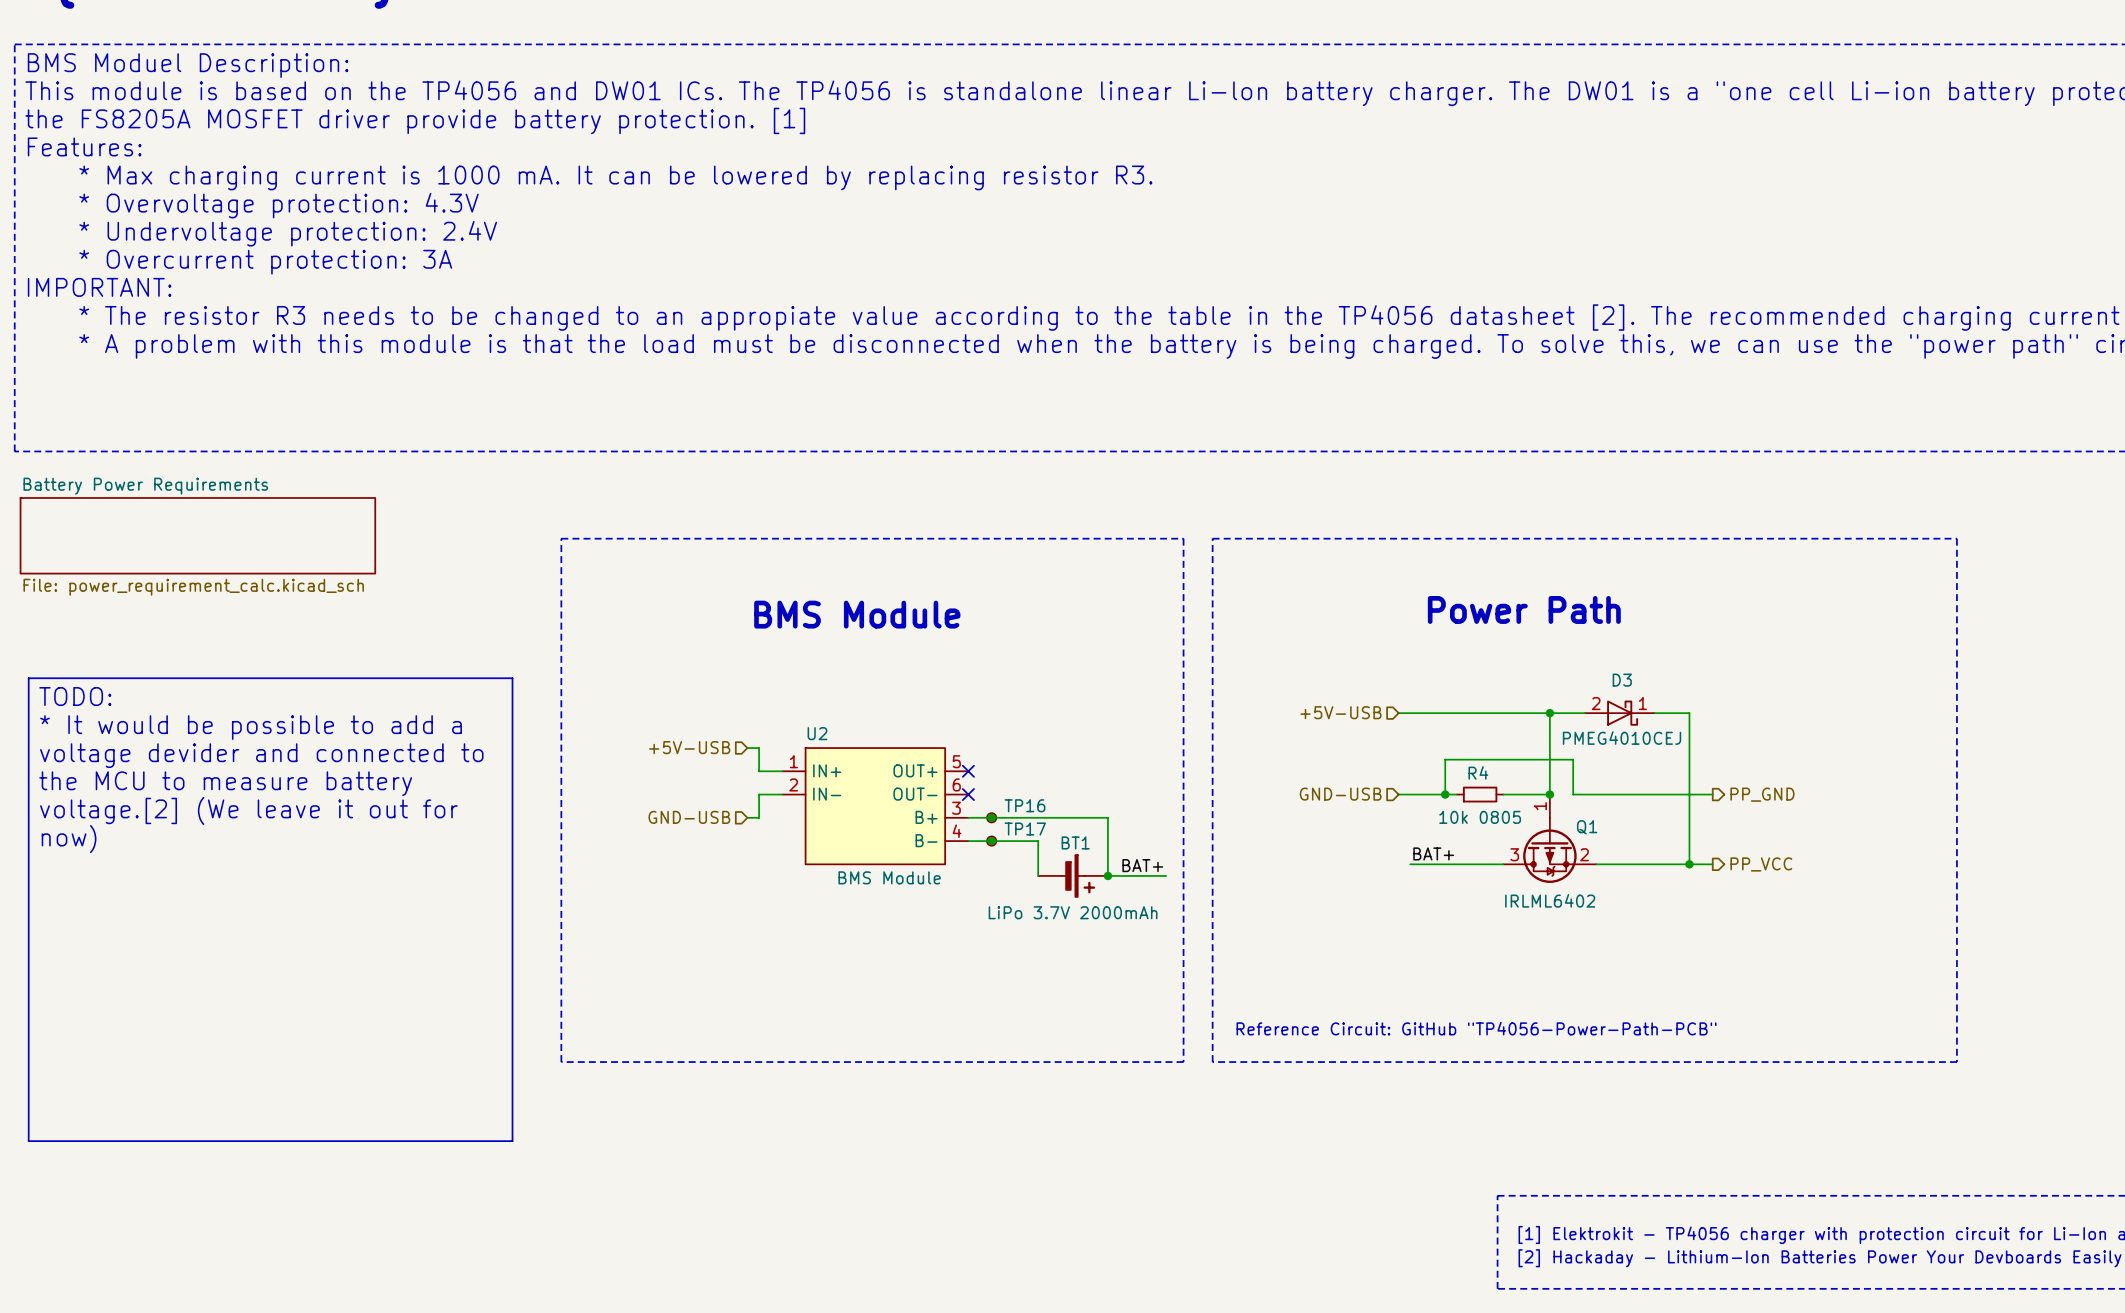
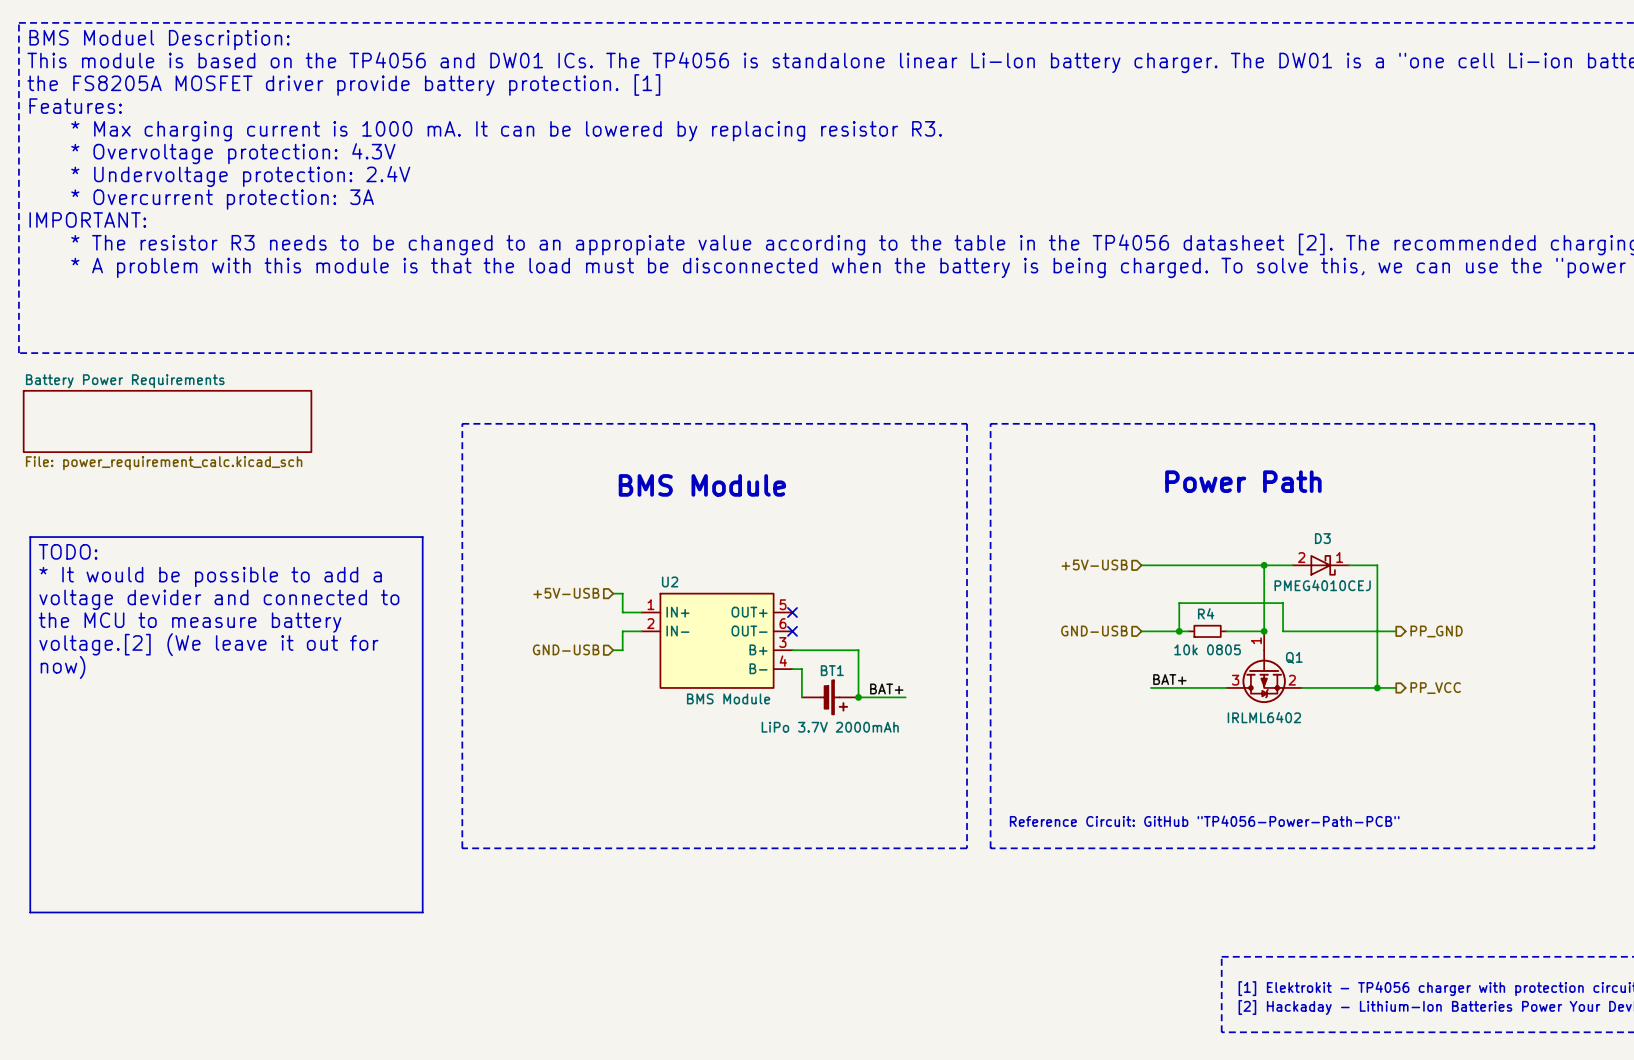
junction: (991, 817) -> none
TP16: (991, 817) -> none
wire: (1049, 817) (1107, 817) (1107, 875) (1166, 875) -> (858, 650) (858, 697) (905, 697)
wire: (980, 841) (1038, 841) (1038, 875) -> (801, 669) (801, 697)
junction: (991, 841) -> none
TP17: (991, 841) -> none
label position: BAT+ (1142, 865) -> BAT+ (886, 688)
junction: none -> (858, 697)
BT1 position: (1073, 875) -> (830, 697)
junction: (1107, 875) -> none

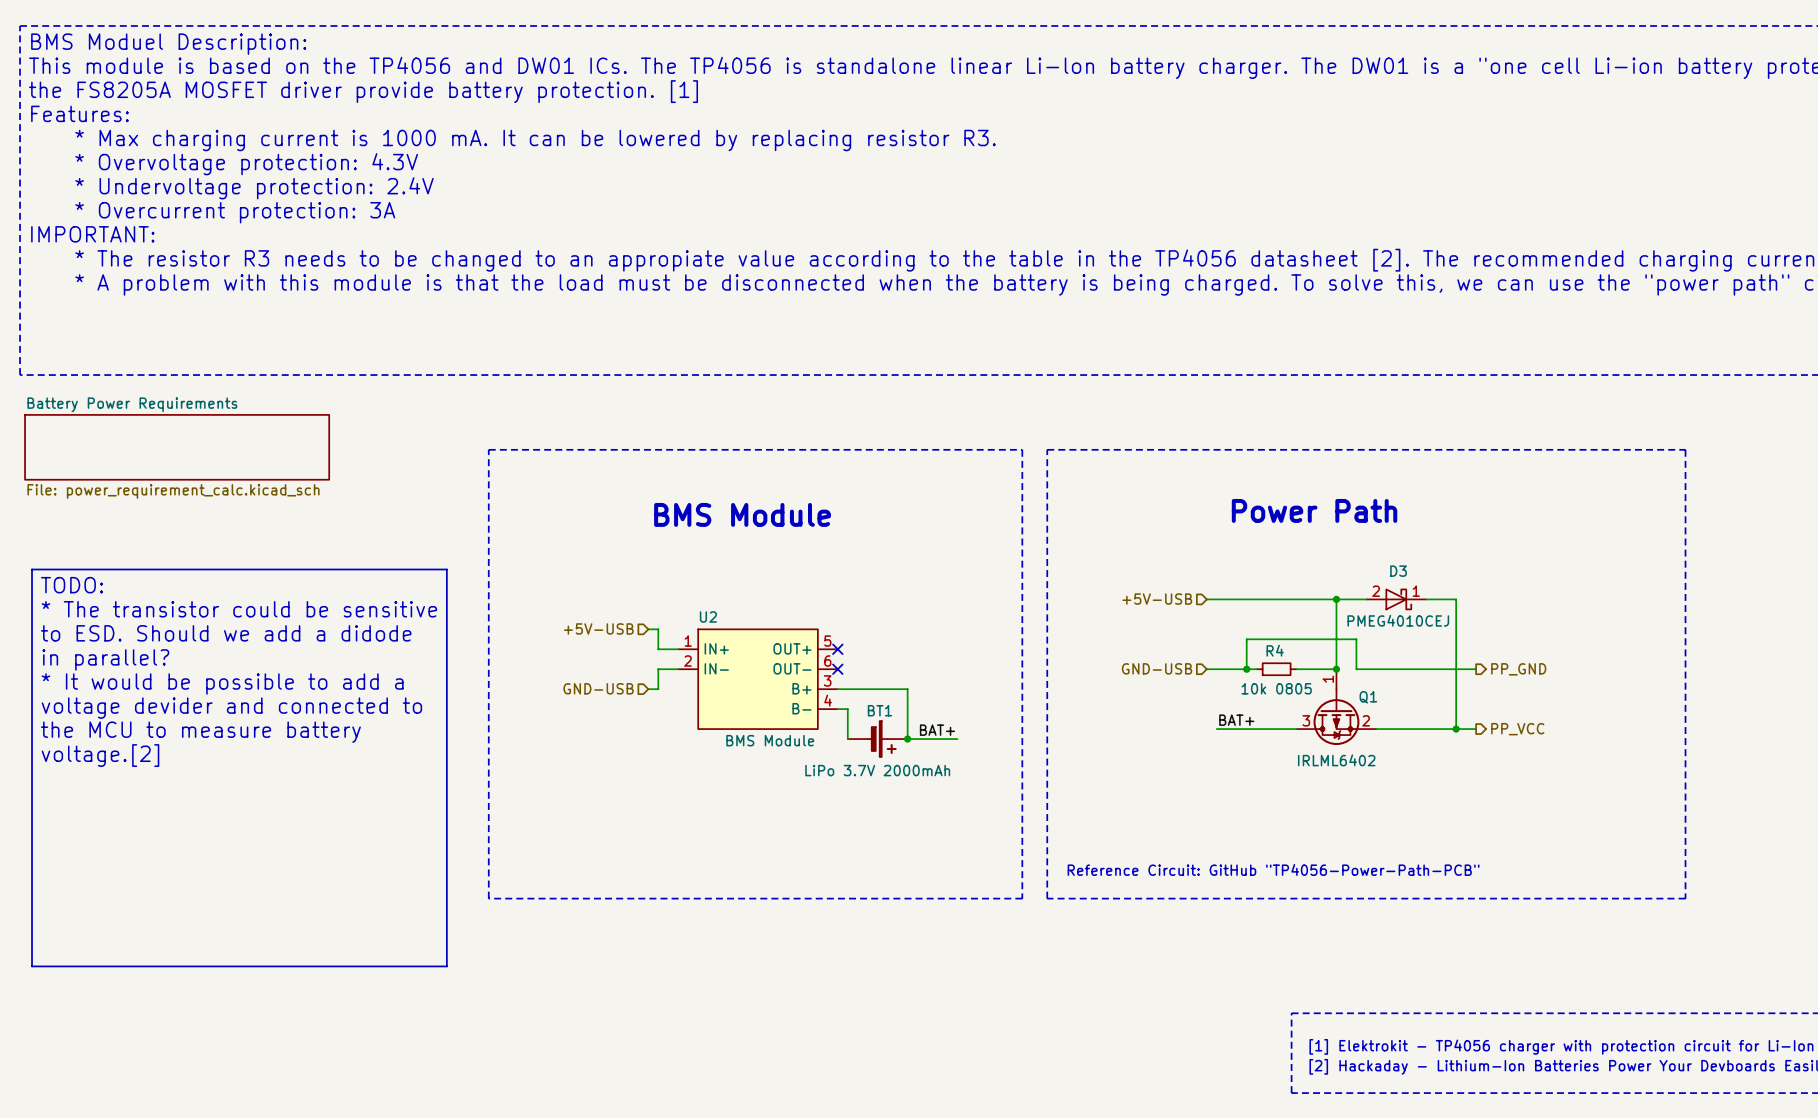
text: * It would be possible to add a (210, 577) -> * The transistor could be sensitive (239, 609)
text: voltage devider and connected to (219, 599) -> to ESD. Should we add a didode (226, 633)
text: the MCU to measure battery (190, 622) -> in parallel? (105, 659)
text: voltage.[2] (We leave it out for (208, 644) -> * It would be possible to add a (222, 684)
text: now) (63, 667) -> voltage devider and connected to (231, 708)
text: none -> the MCU to measure battery (200, 732)
text: none -> voltage.[2] (100, 755)

